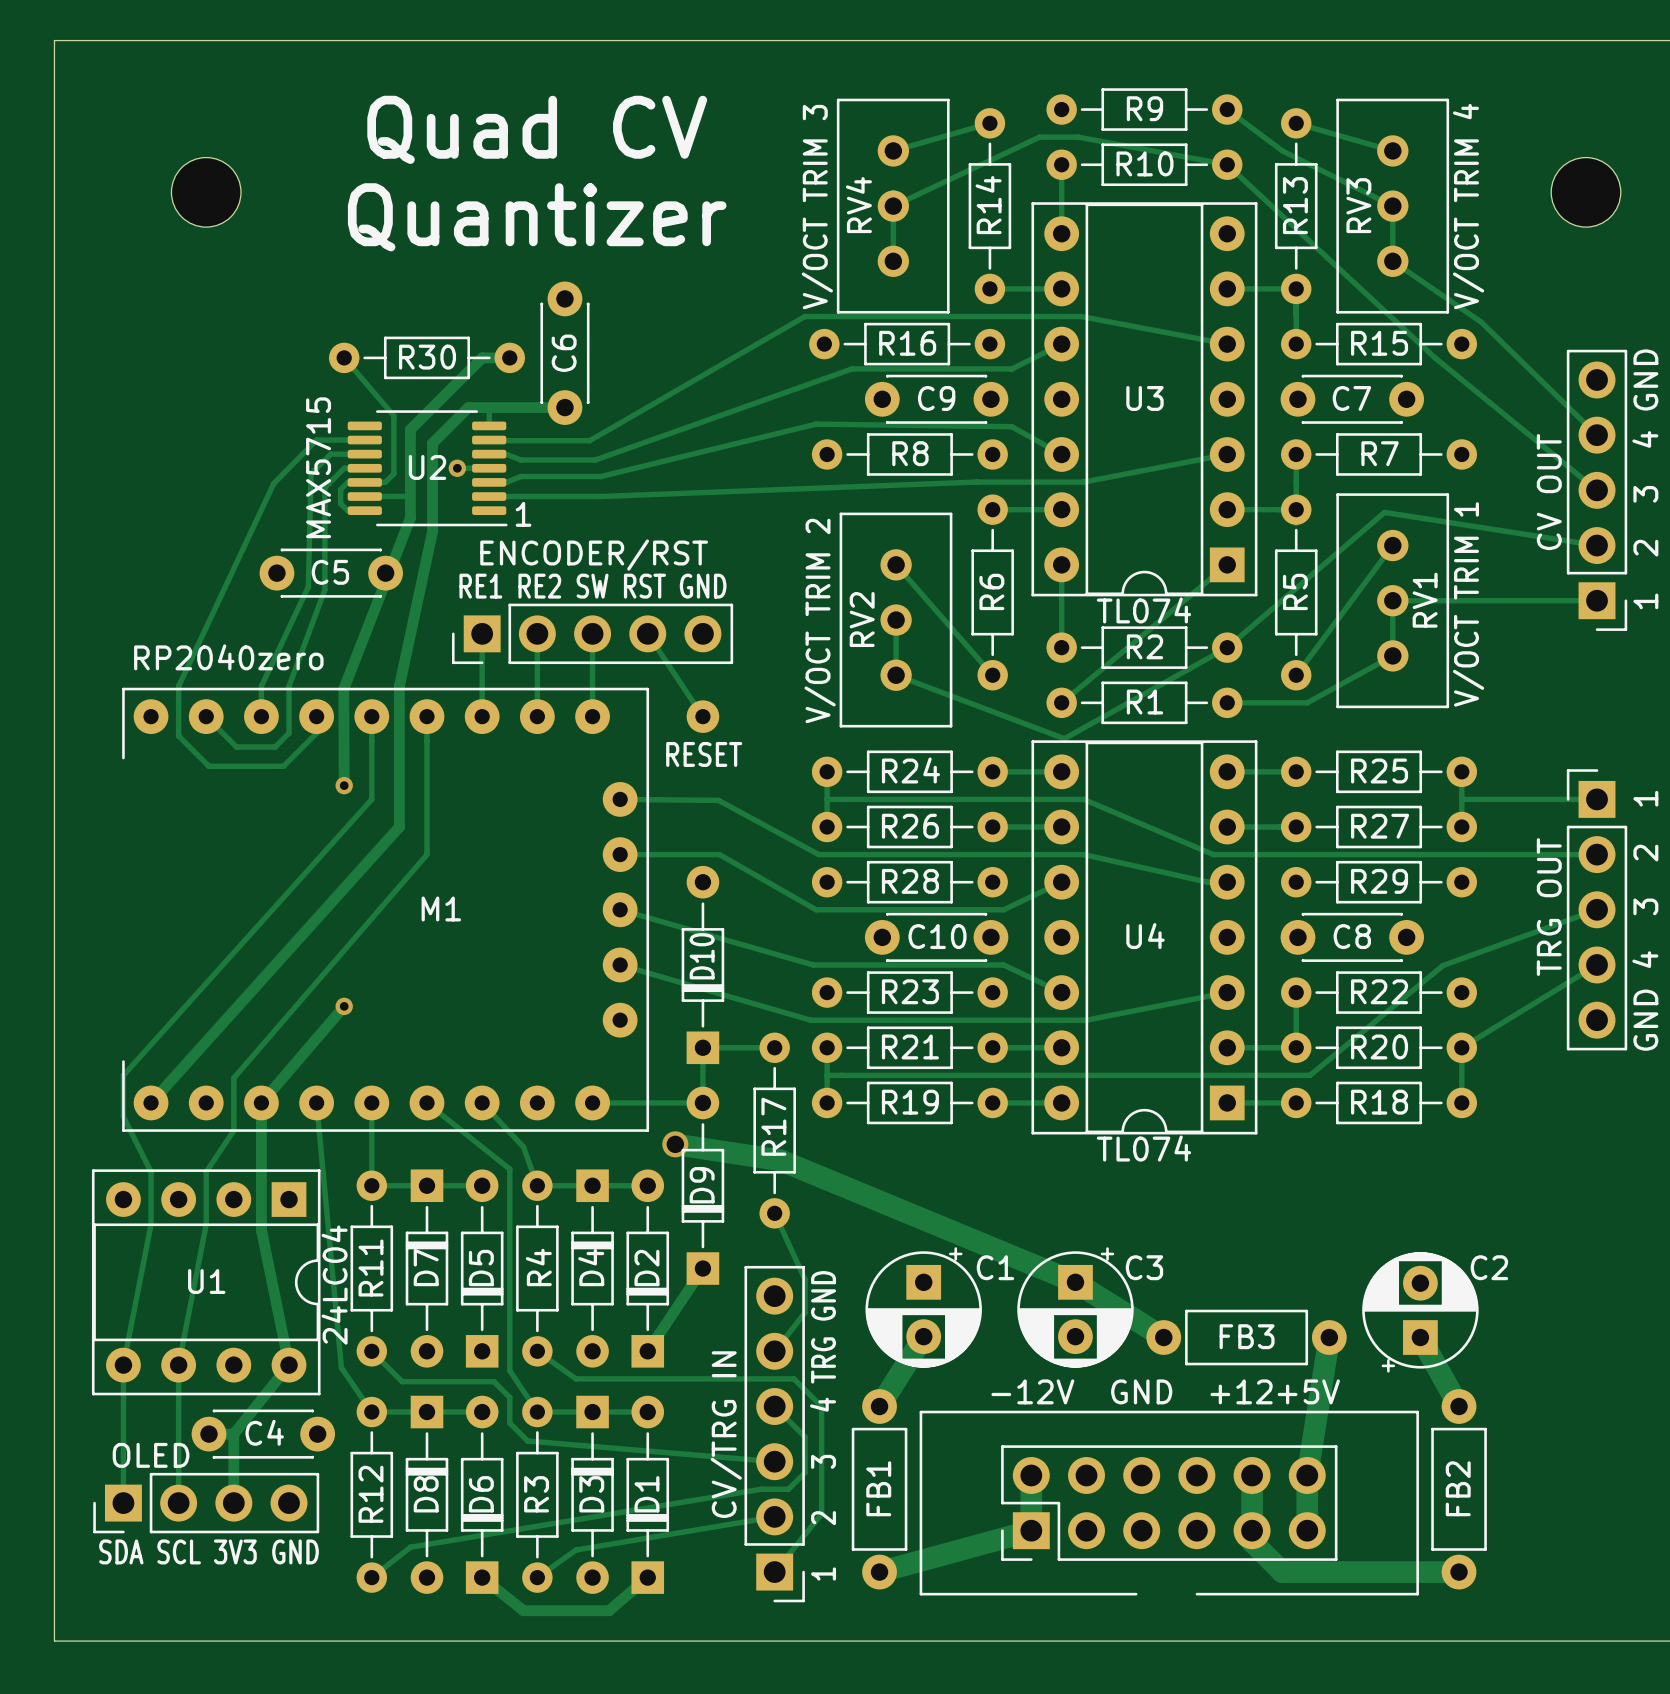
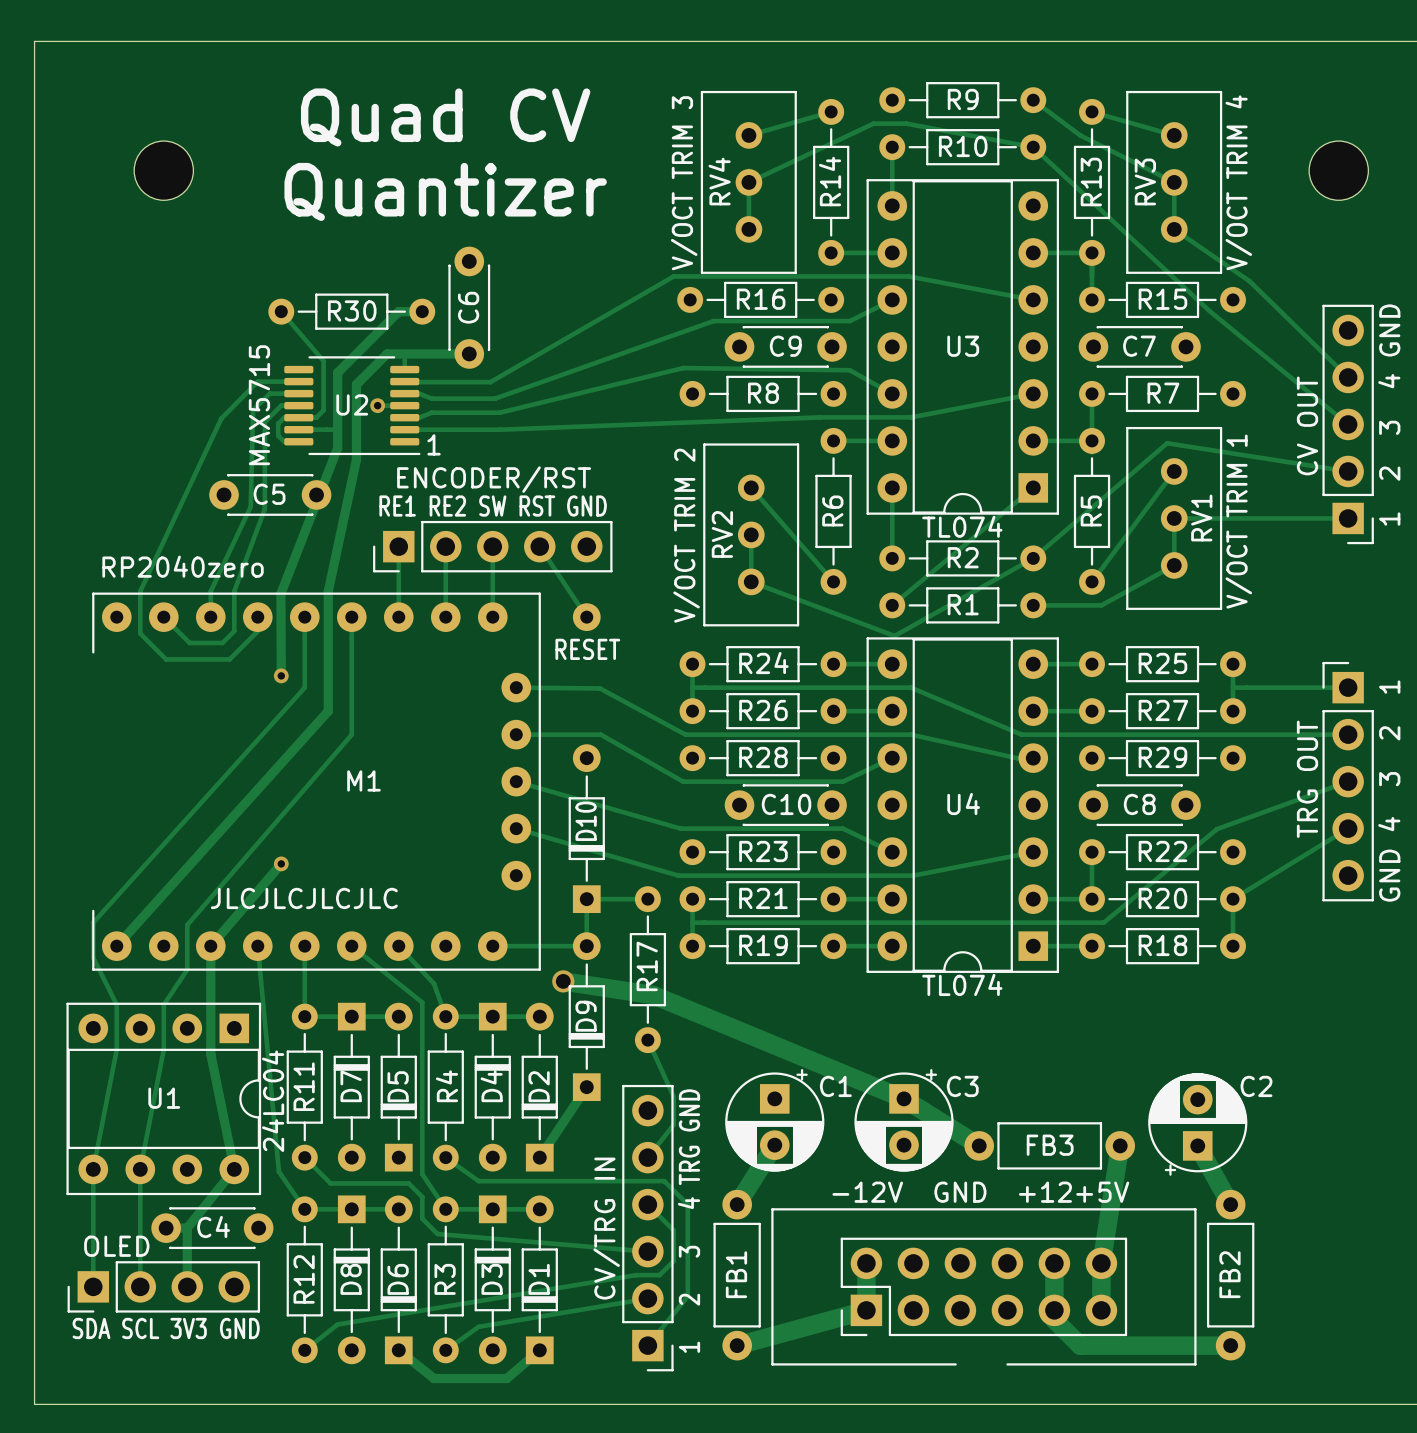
text: none -> JLCJLCJLCJLC (304, 898)

